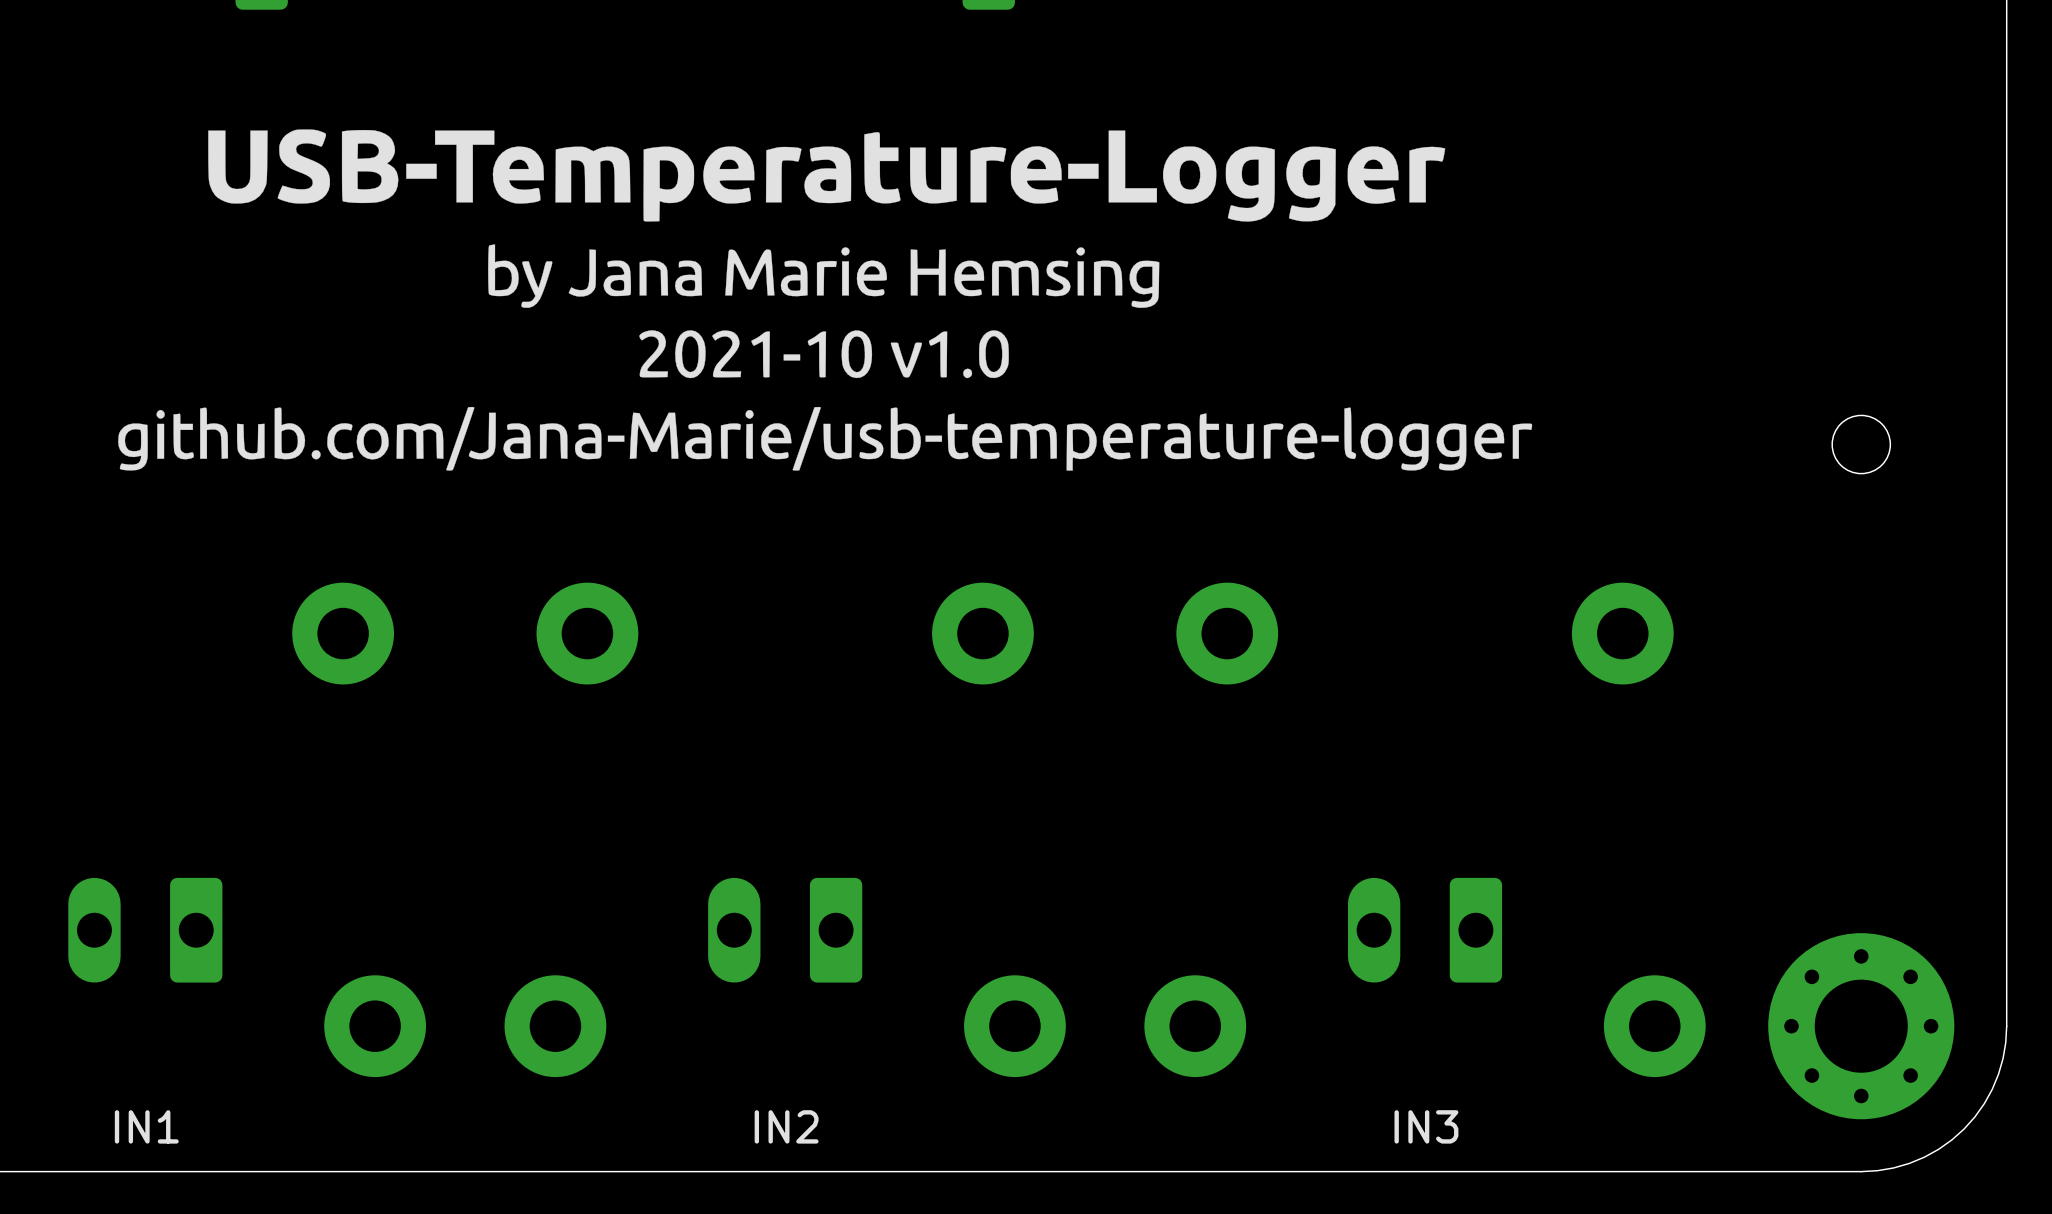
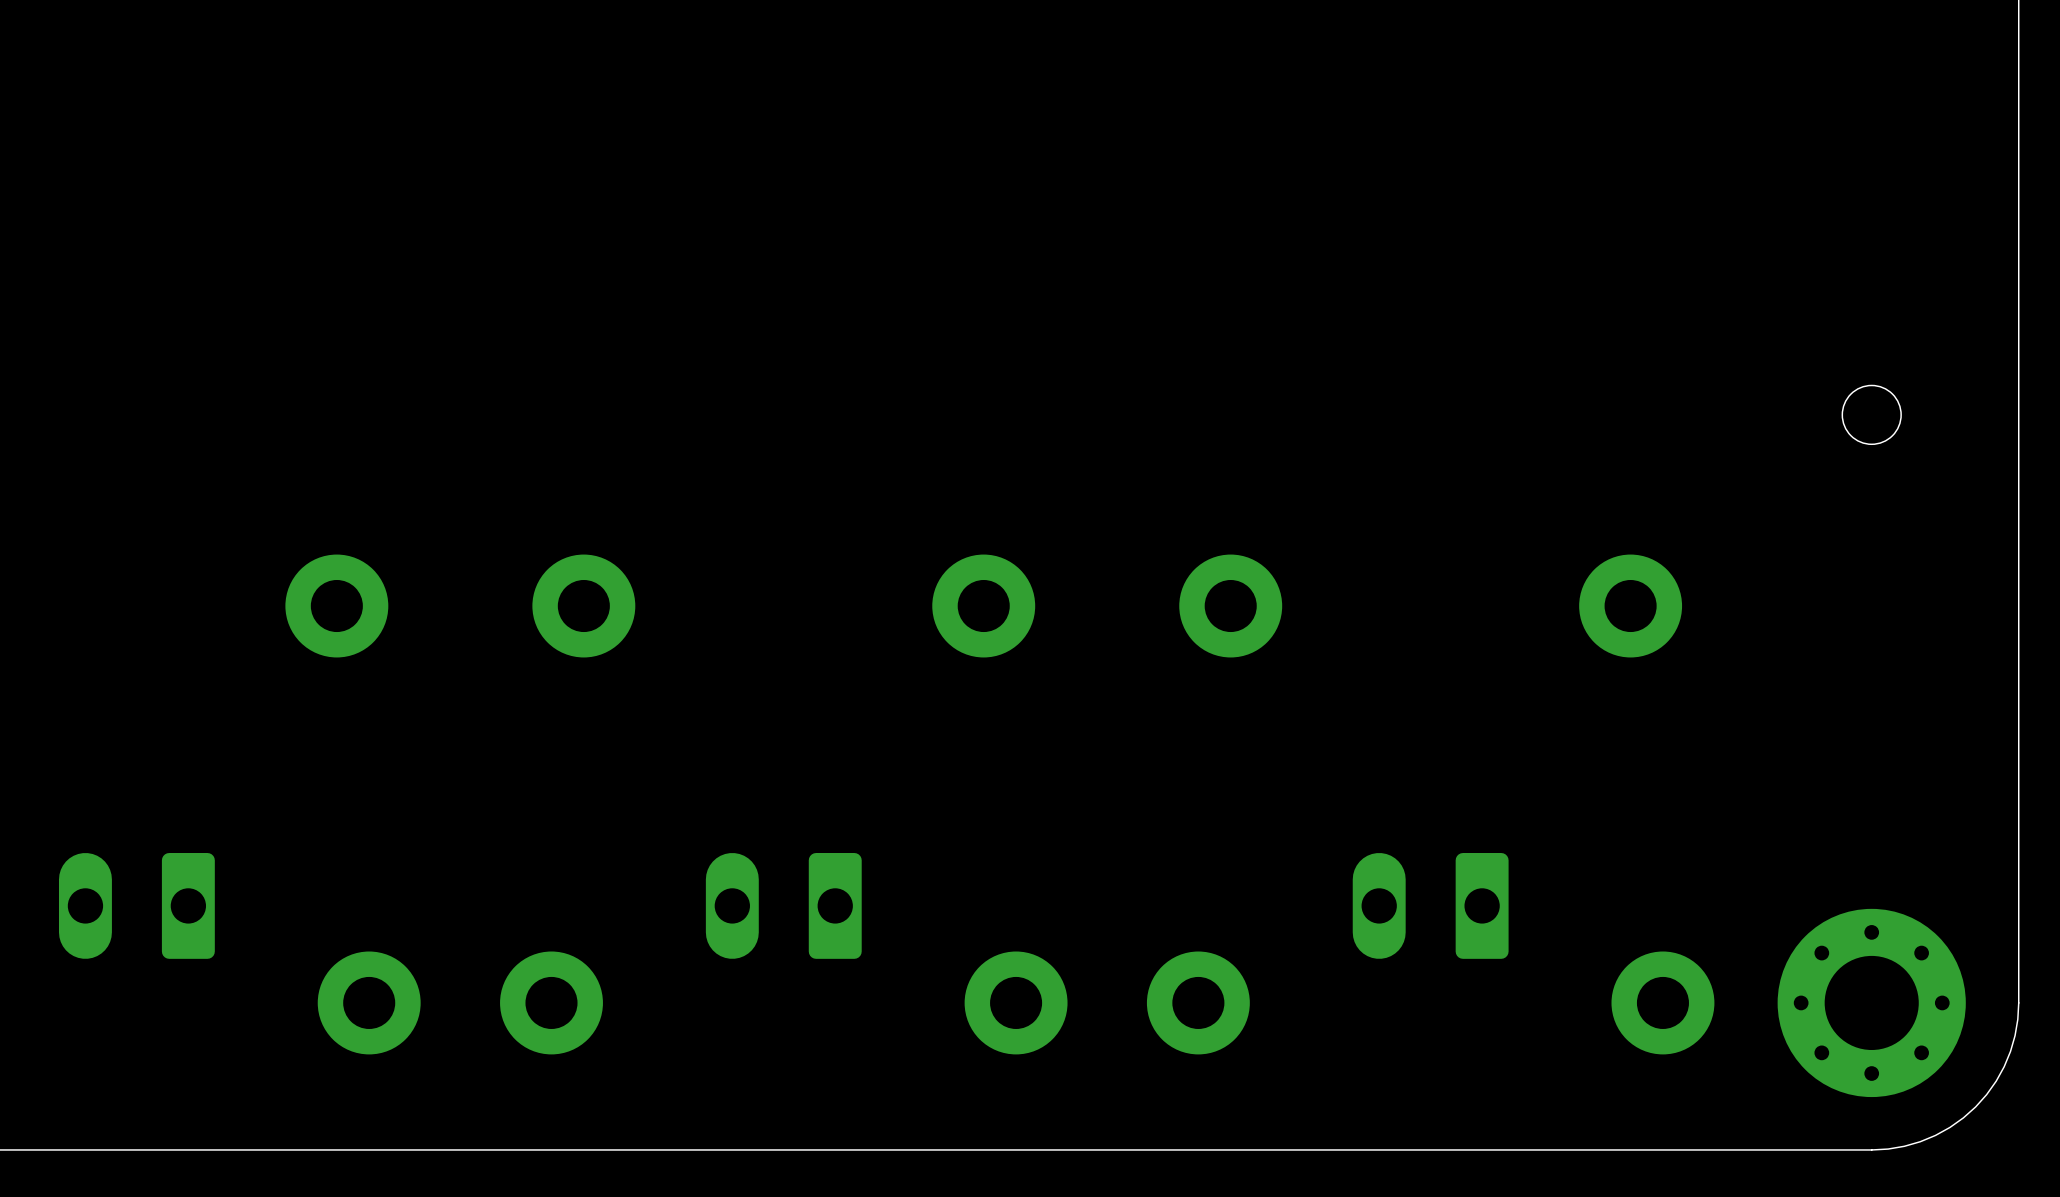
drawing: [118, 129, 1533, 471] -> none
text: IN1 (146, 1126) -> none
text: IN2 (786, 1126) -> none
text: IN3 (1426, 1126) -> none

